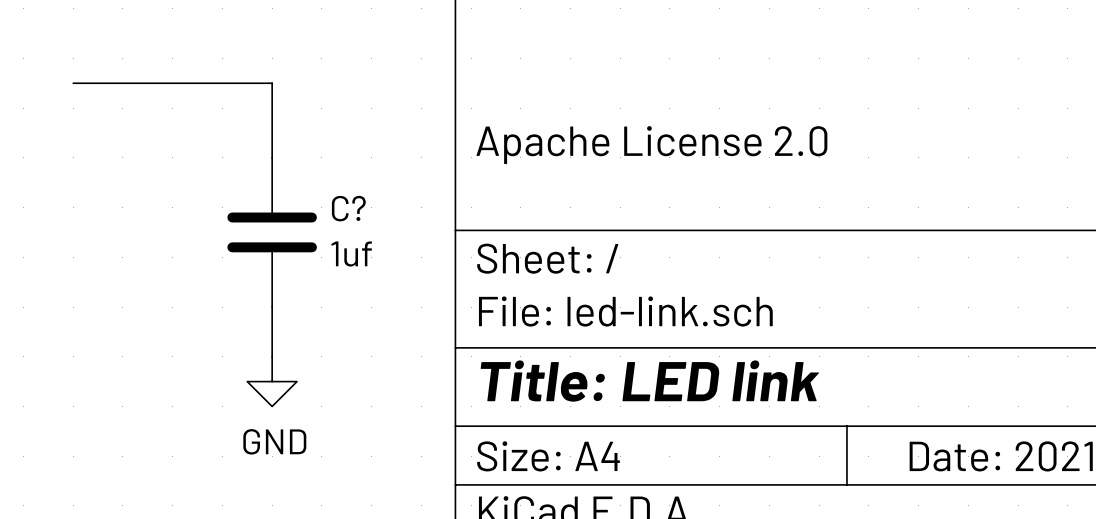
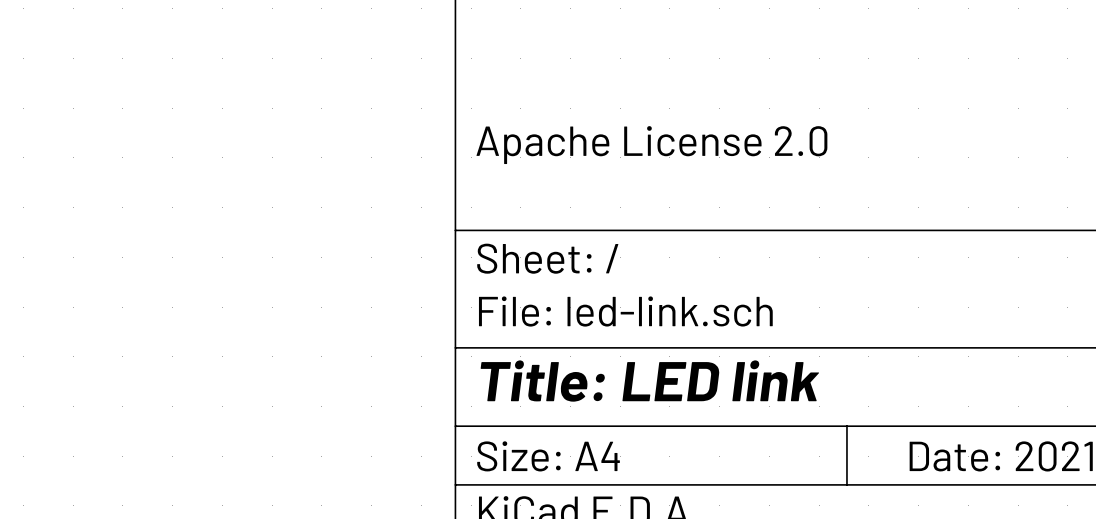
wire: (73, 83) (272, 83) (272, 157) -> none
C?: 1uf (272, 232) -> none
wire: (272, 307) (272, 356) -> none
power symbol: GND (272, 381) -> none

